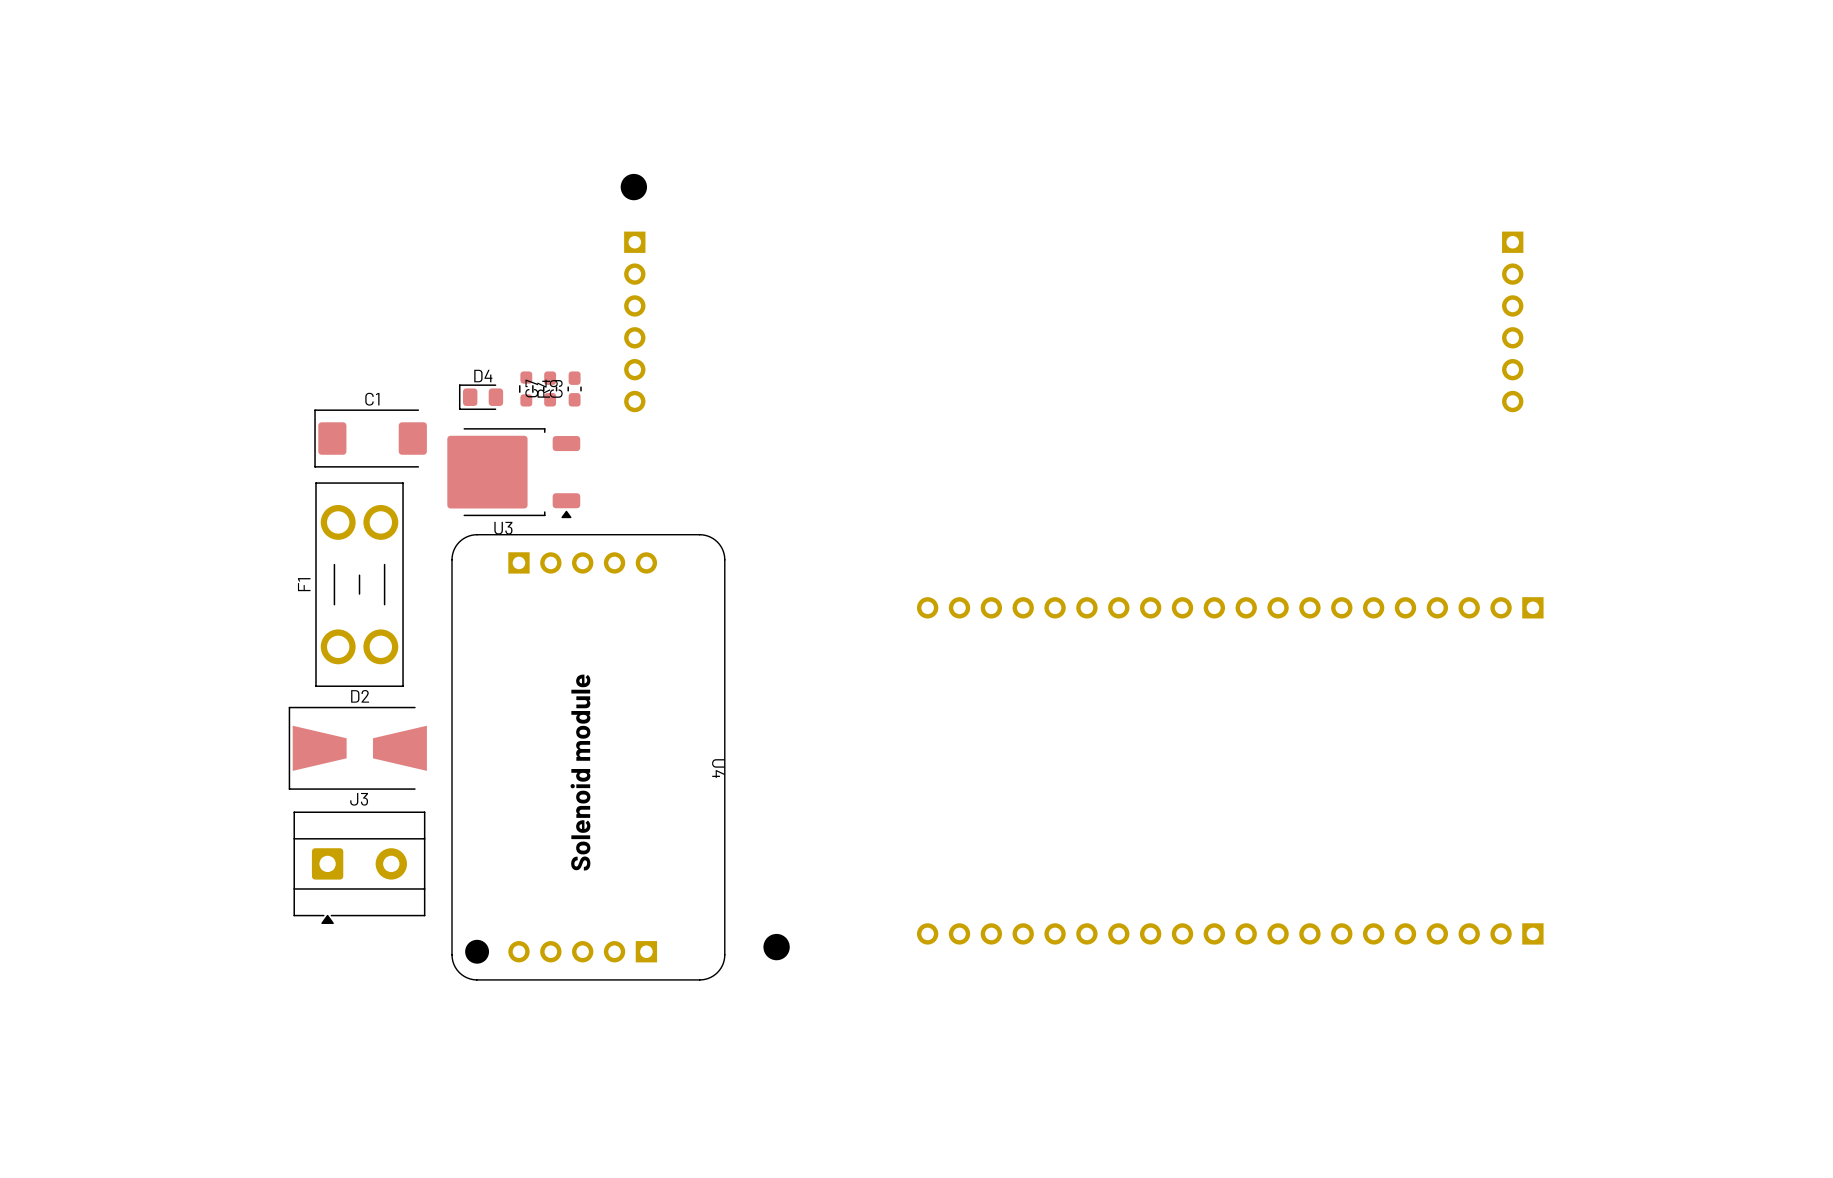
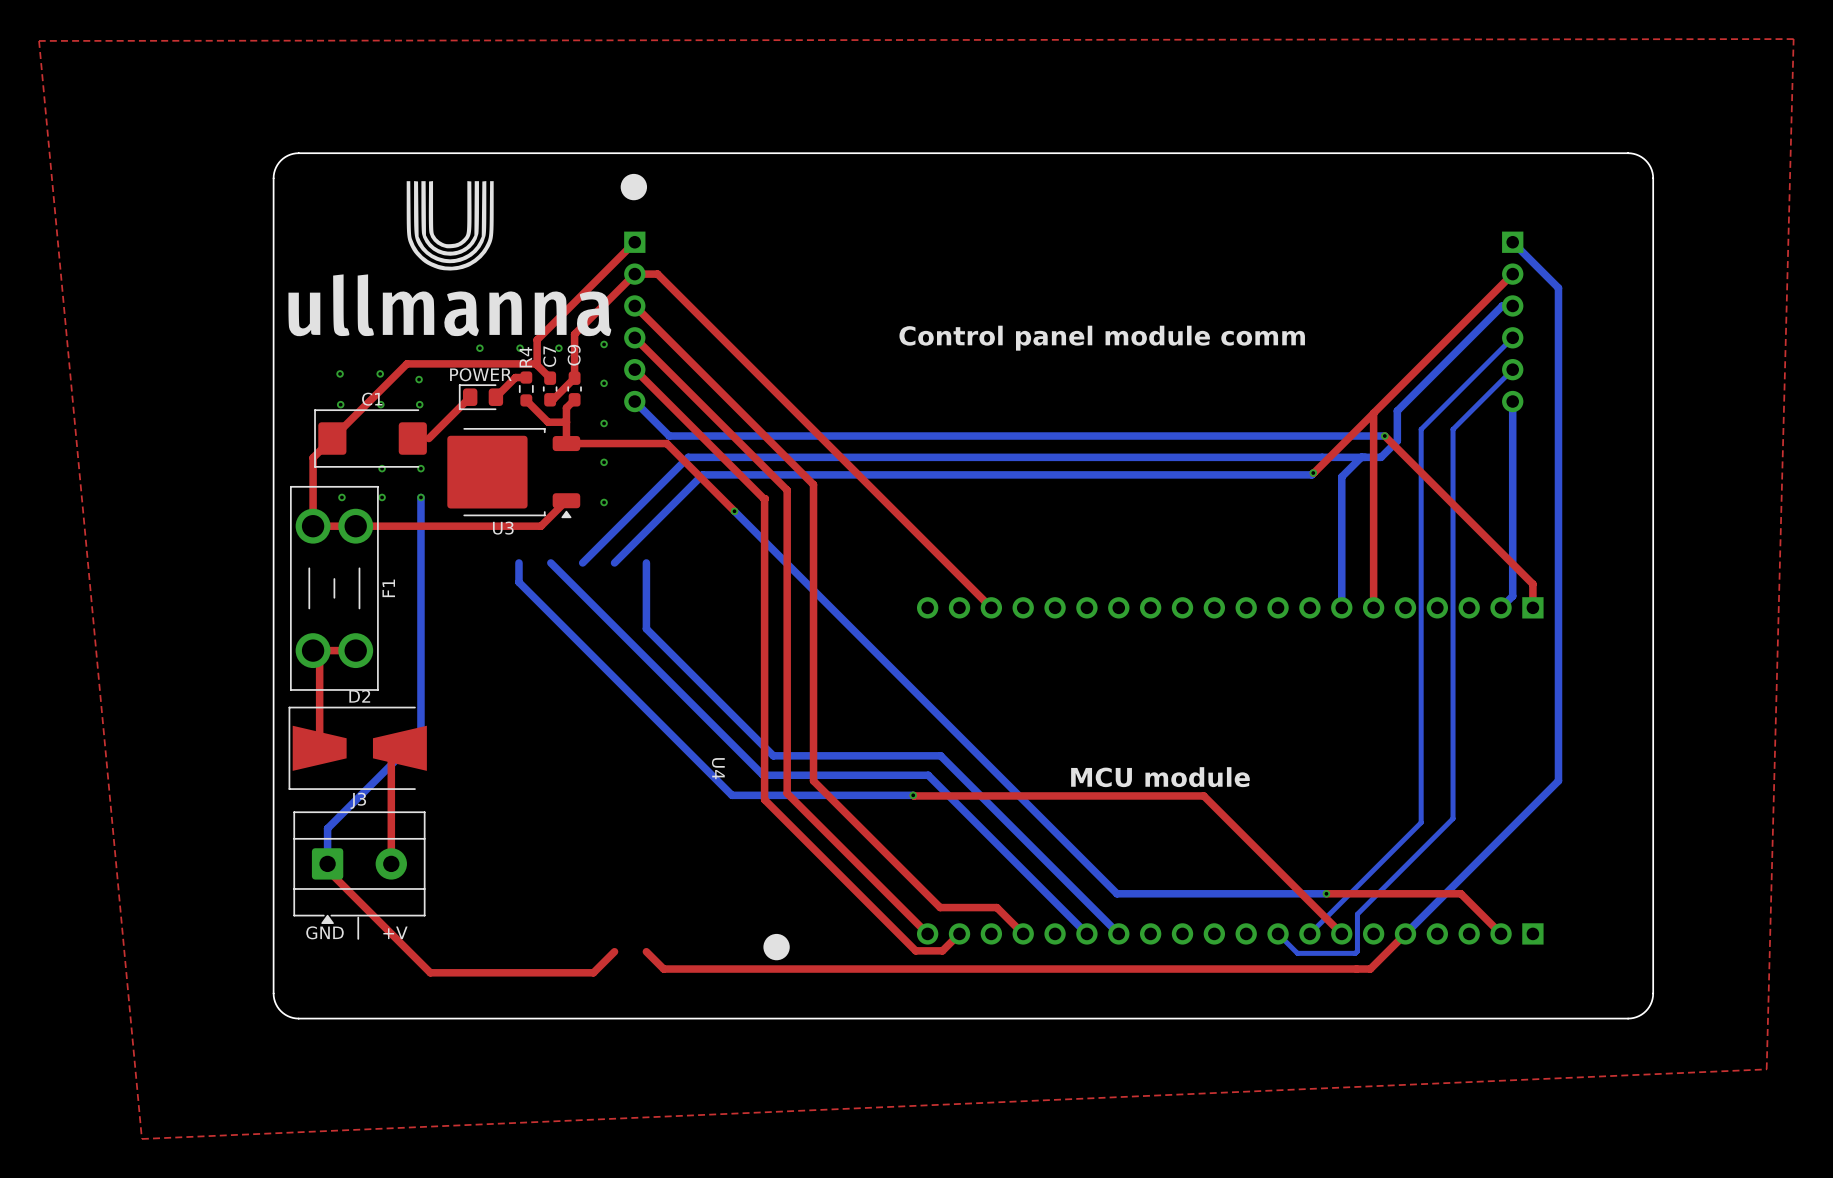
top zone outline: none -> (1793, 39) (1766, 1069) (141, 1138) (39, 40) (1793, 39)
board edge: none -> (298, 153) (1628, 153) (1641, 157) (1650, 167) (1653, 178) (1653, 993) (1649, 1006) (1638, 1016) (1628, 1018) (298, 1018) (285, 1014) (276, 1004) (273, 993) (273, 178) (275, 170) (280, 160) (290, 154) (298, 153)
drawing: none -> [288, 181, 612, 337]
top track: none -> (634, 242) (537, 339) (537, 365)
bottom track: none -> (1512, 242) (1558, 288) (1558, 780) (1405, 933)
top track: none -> (1512, 274) (1373, 413) (1373, 607)
top track: none -> (634, 305) (813, 484) (813, 780) (940, 907) (996, 907) (1023, 933)
bottom track: none -> (1512, 305) (1502, 305) (1397, 410) (1397, 441) (1381, 457) (688, 457) (582, 562)
top track: none -> (634, 337) (787, 490) (787, 793) (927, 933)
bottom track: none -> (1512, 337) (1421, 429) (1421, 822) (1309, 933)
text: none -> Control panel module comm (1102, 338)
via: none -> (604, 344)
via: none -> (479, 348)
via: none -> (520, 348)
via: none -> (558, 348)
top track: none -> (634, 369) (765, 498) (764, 799) (915, 950) (942, 950) (959, 933)
bottom track: none -> (1512, 369) (1453, 429) (1453, 818) (1357, 914) (1357, 951) (1355, 953) (1297, 953) (1278, 933)
via: none -> (340, 373)
via: none -> (380, 373)
text: none -> POWER (480, 374)
D4 name: D4 (483, 376) -> none
top track: none -> (526, 377) (515, 377) (495, 397)
top track: none -> (550, 378) (535, 363) (406, 363) (313, 457) (313, 526) (540, 526) (566, 500)
via: none -> (419, 379)
via: none -> (604, 383)
C7 name position: C7 (531, 388) -> C7 (549, 356)
R4 name position: R4 (543, 388) -> R4 (525, 357)
C9 name position: C9 (556, 388) -> C9 (574, 355)
top track: none -> (470, 397) (428, 438)
top track: none -> (550, 399) (552, 399) (574, 378) (574, 334) (634, 274) (657, 274) (991, 607)
top track: none -> (574, 399) (566, 407) (566, 443) (666, 443) (734, 511)
top track: none -> (526, 400) (548, 422) (566, 422)
bottom track: none -> (634, 401) (669, 436) (1384, 436)
bottom track: none -> (1512, 401) (1512, 596) (1501, 607)
via: none -> (340, 404)
via: none -> (380, 404)
via: none -> (419, 404)
top track: none -> (1373, 413) (1313, 473)
via: none -> (604, 423)
top track: none -> (1384, 436) (1532, 584) (1532, 607)
via: none -> (1384, 436)
bottom track: none -> (1361, 457) (1341, 476) (1341, 607)
via: none -> (604, 462)
via: none -> (382, 468)
via: none -> (420, 468)
bottom track: none -> (1313, 473) (1311, 474) (702, 474) (614, 562)
via: none -> (1313, 473)
via: none -> (341, 497)
via: none -> (382, 497)
bottom track: none -> (420, 497) (420, 735) (327, 828) (327, 863)
via: none -> (420, 497)
via: none -> (604, 502)
bottom track: none -> (734, 511) (1117, 893) (1326, 893)
via: none -> (734, 511)
bottom track: none -> (518, 562) (518, 582) (731, 795) (913, 795)
bottom track: none -> (550, 562) (763, 775) (928, 775) (1086, 933)
bottom track: none -> (646, 562) (646, 628) (773, 755) (940, 755) (1118, 933)
F1 name position: F1 (304, 584) -> F1 (388, 588)
F1 position: (359, 584) -> (334, 588)
top track: none -> (355, 650) (313, 650) (319, 657) (319, 748)
top track: none -> (399, 748) (391, 756) (391, 863)
part: (588, 757) -> none
text: none -> MCU module (1160, 777)
top track: none -> (913, 795) (1203, 795) (1341, 933)
via: none -> (913, 795)
top track: none -> (327, 870) (430, 972) (593, 972) (614, 951)
top track: none -> (1326, 893) (1460, 893) (1501, 933)
via: none -> (1326, 893)
line: none -> (358, 917) (358, 938)
text: none -> GND (324, 932)
text: none -> +V (395, 932)
top track: none -> (1405, 933) (1370, 969) (663, 969) (646, 951)

